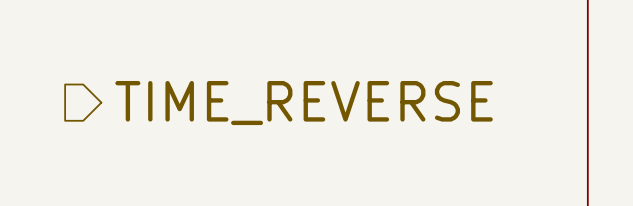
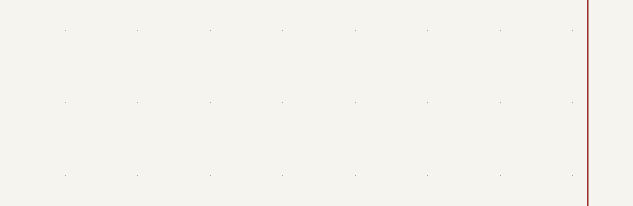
hierarchical label: TIME_REVERSE (304, 103) -> none

